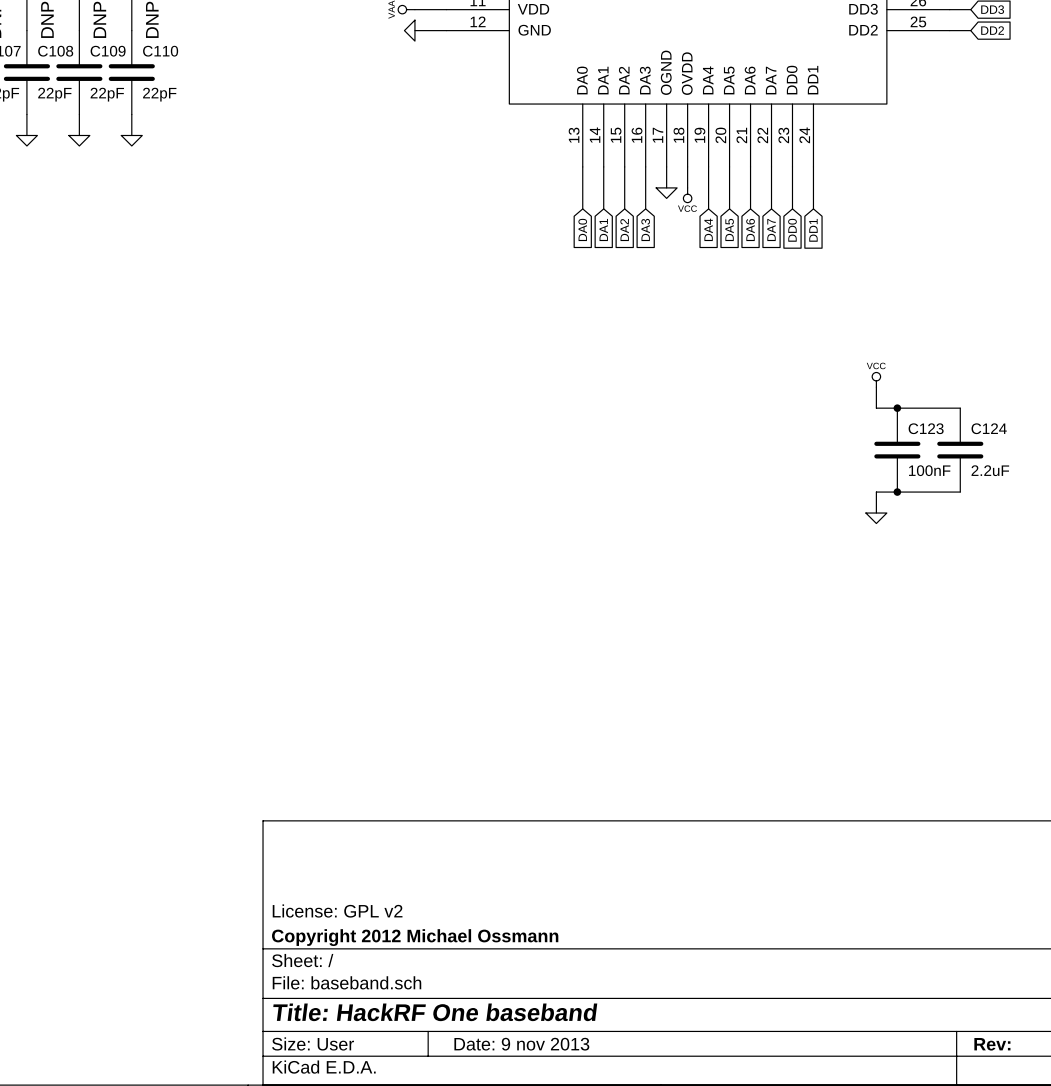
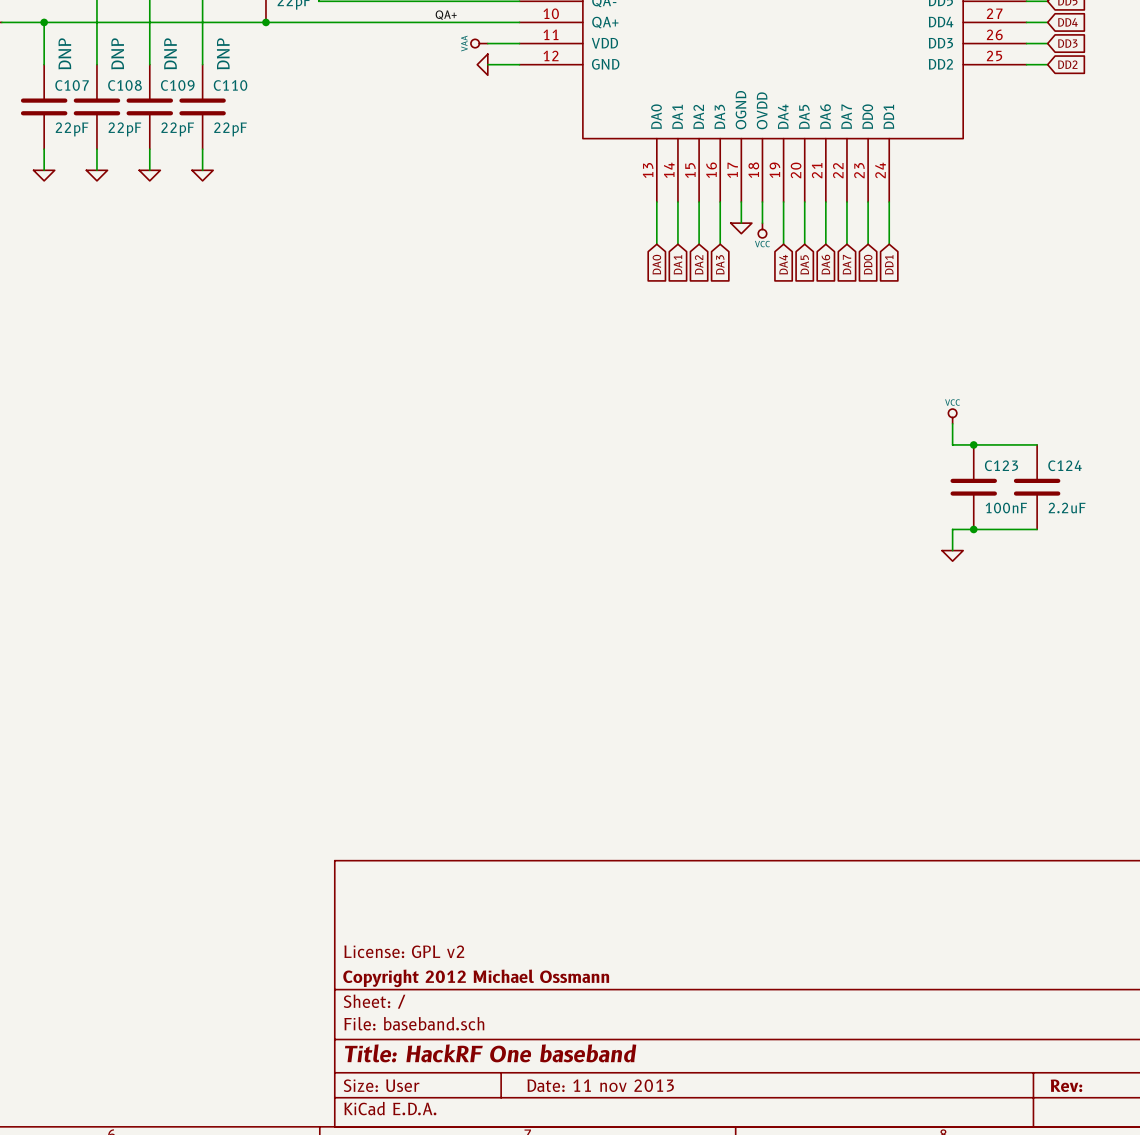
title block: Date: 9 nov 2013 (521, 1044) -> Date: 11 nov 2013 (600, 1085)

